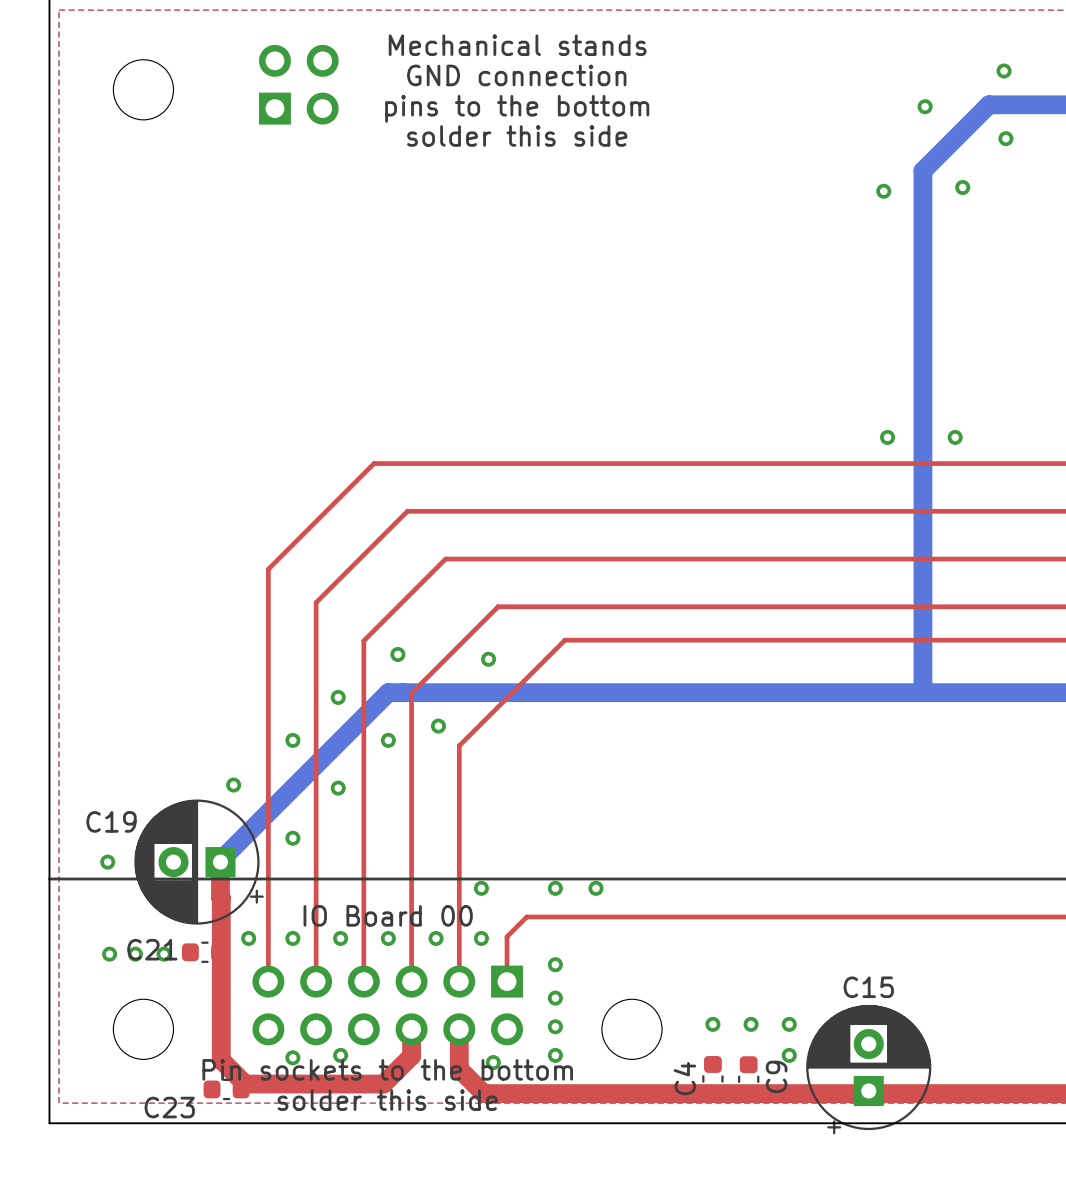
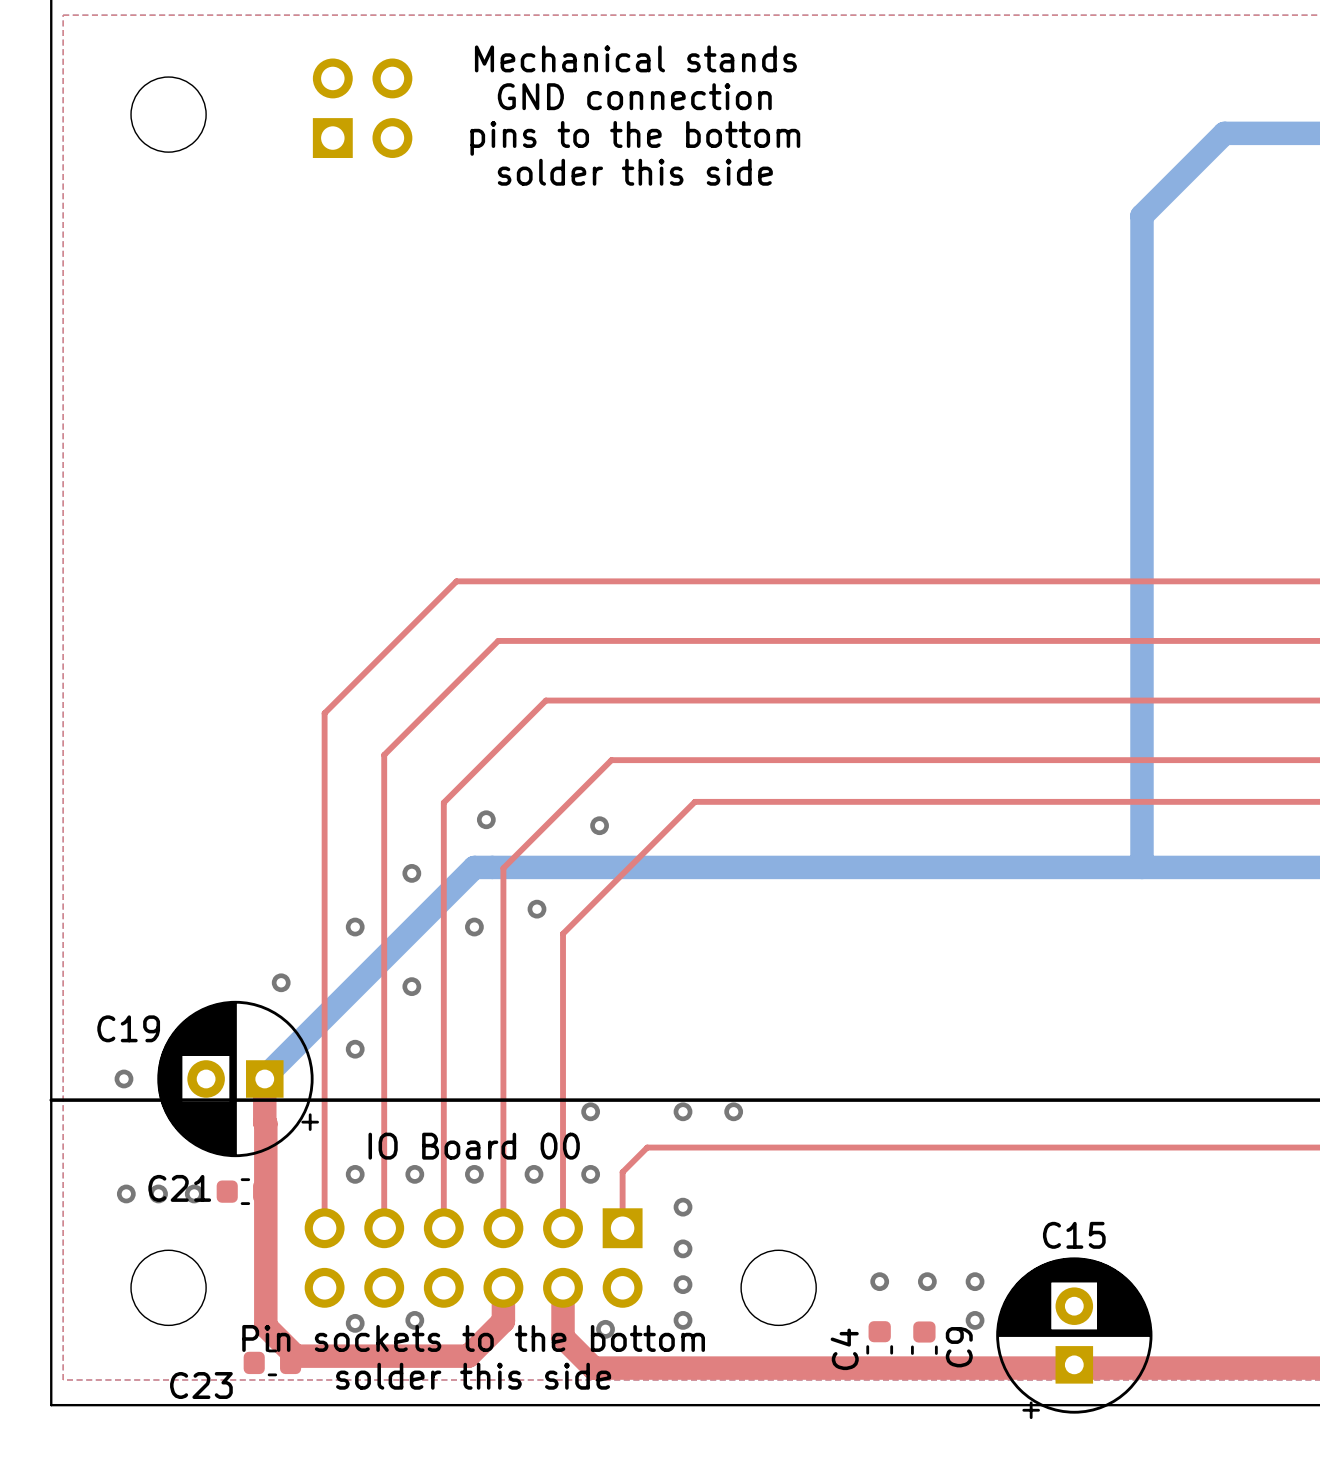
via: (1004, 71) -> none
via: (925, 106) -> none
via: (1005, 138) -> none
via: (962, 187) -> none
via: (883, 191) -> none
via: (887, 437) -> none
via: (955, 437) -> none
via: (248, 938) -> none

